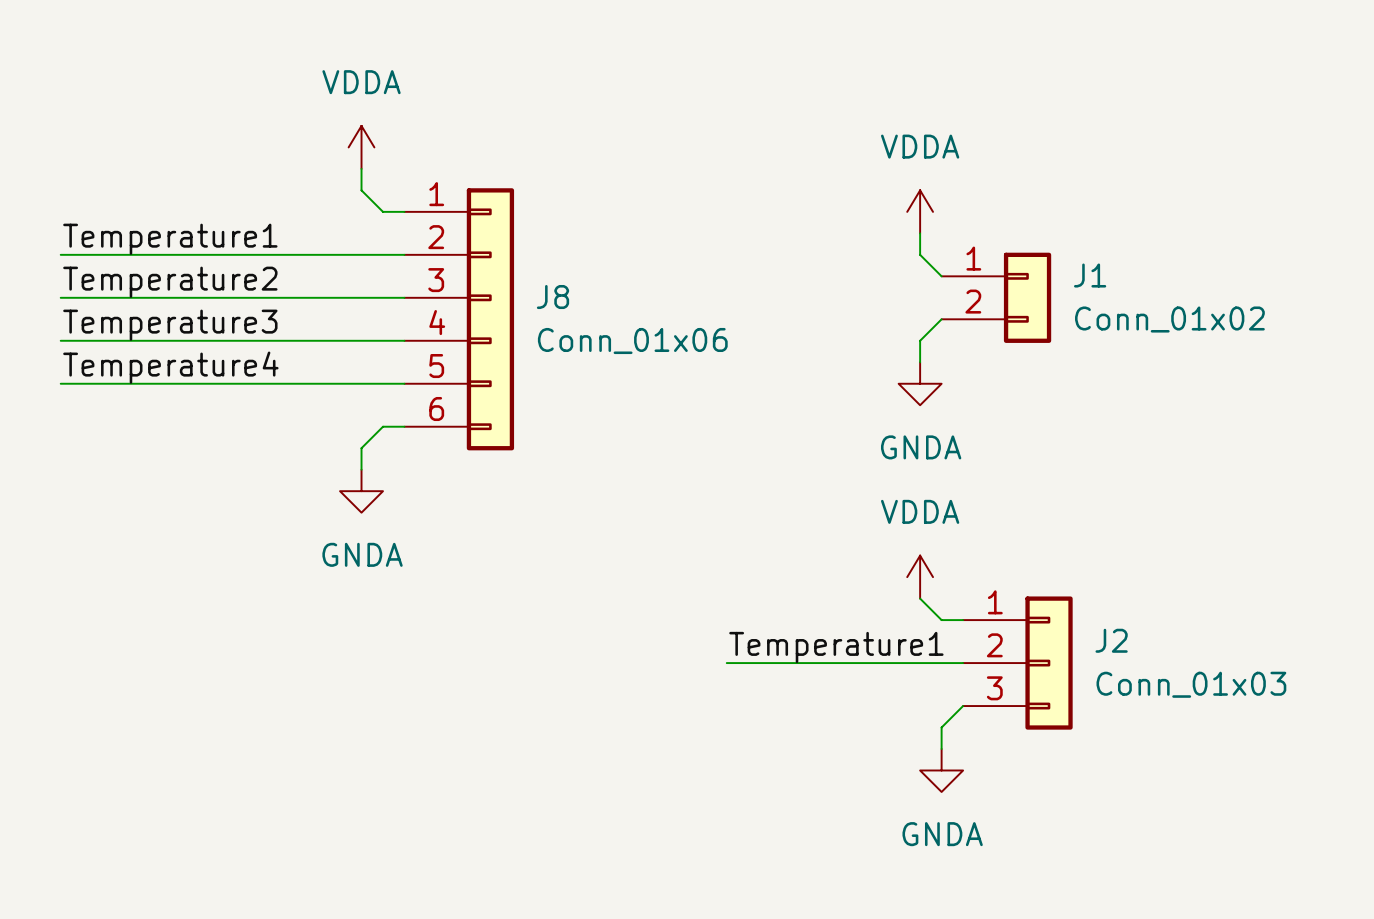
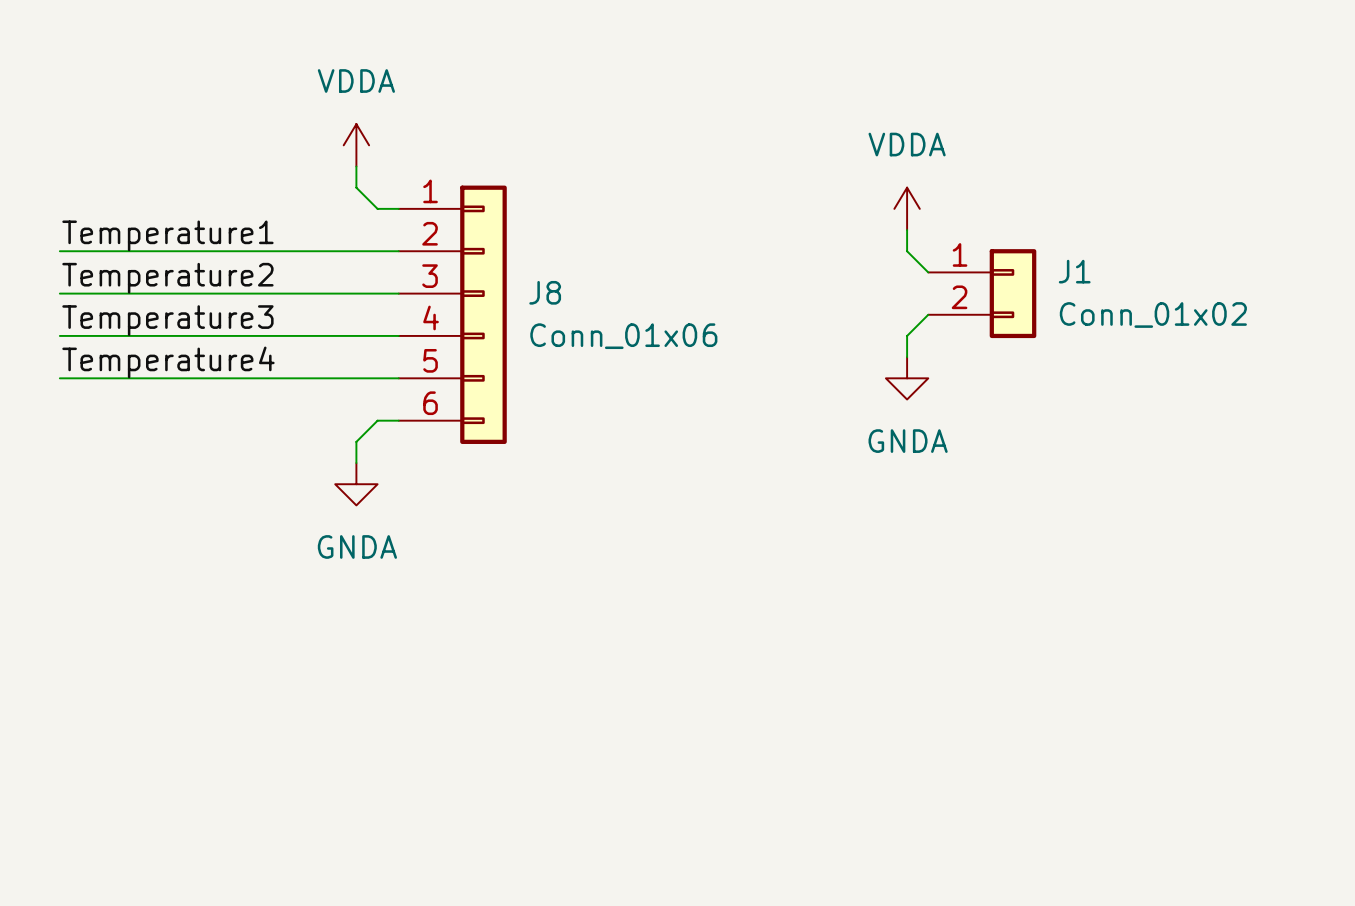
power symbol: VDDA (920, 577) -> none
wire: (920, 598) (941, 620) (963, 620) -> none
label: Temperature1 (836, 647) -> none
wire: (726, 663) (963, 663) -> none
J2: Conn_01x03 (1017, 663) -> none
wire: (963, 706) (941, 727) (941, 748) -> none
power symbol: GNDA (941, 770) -> none

